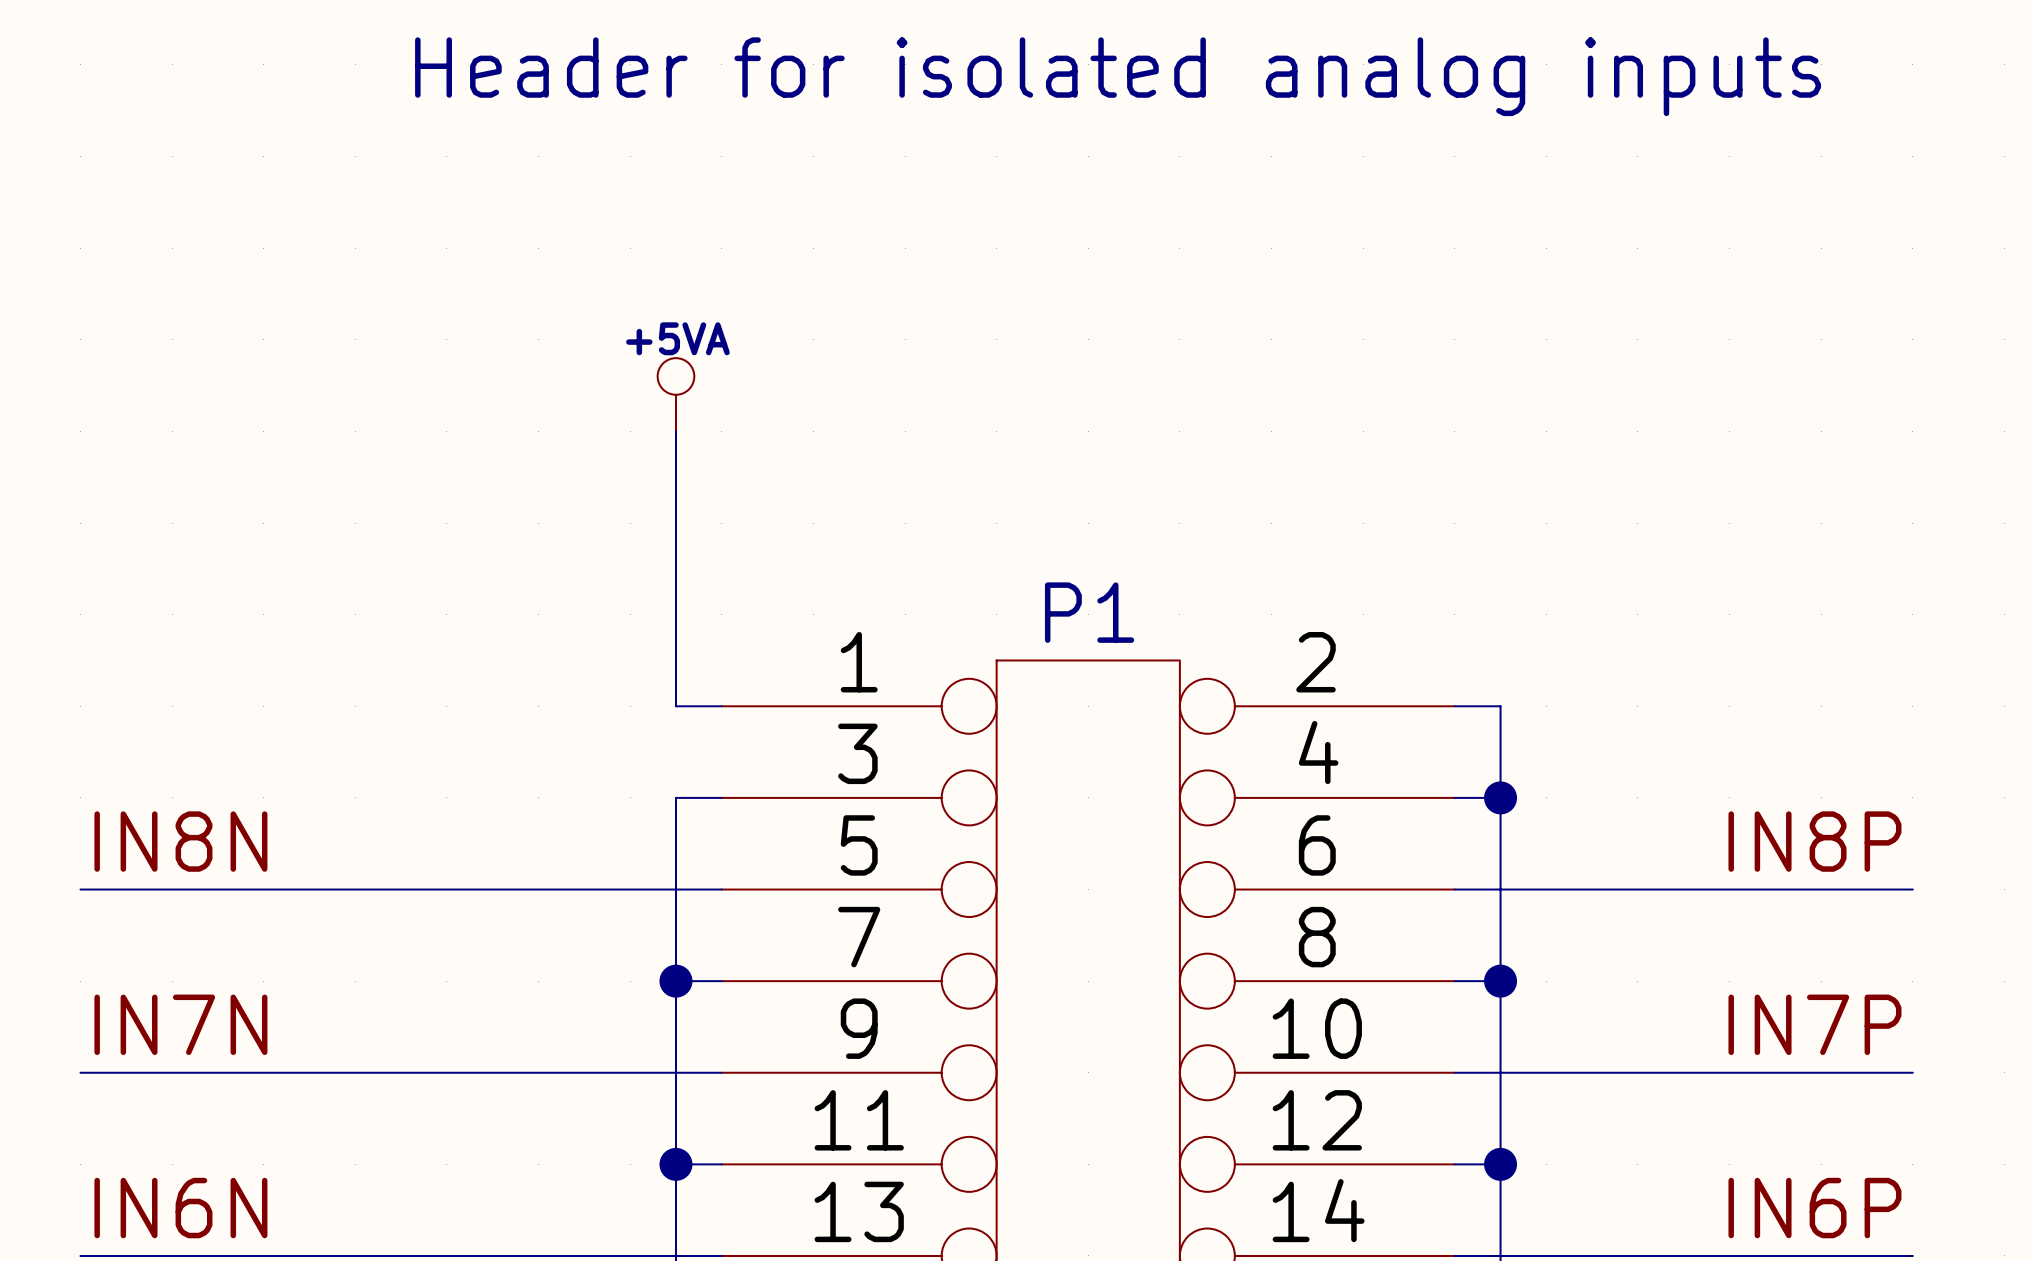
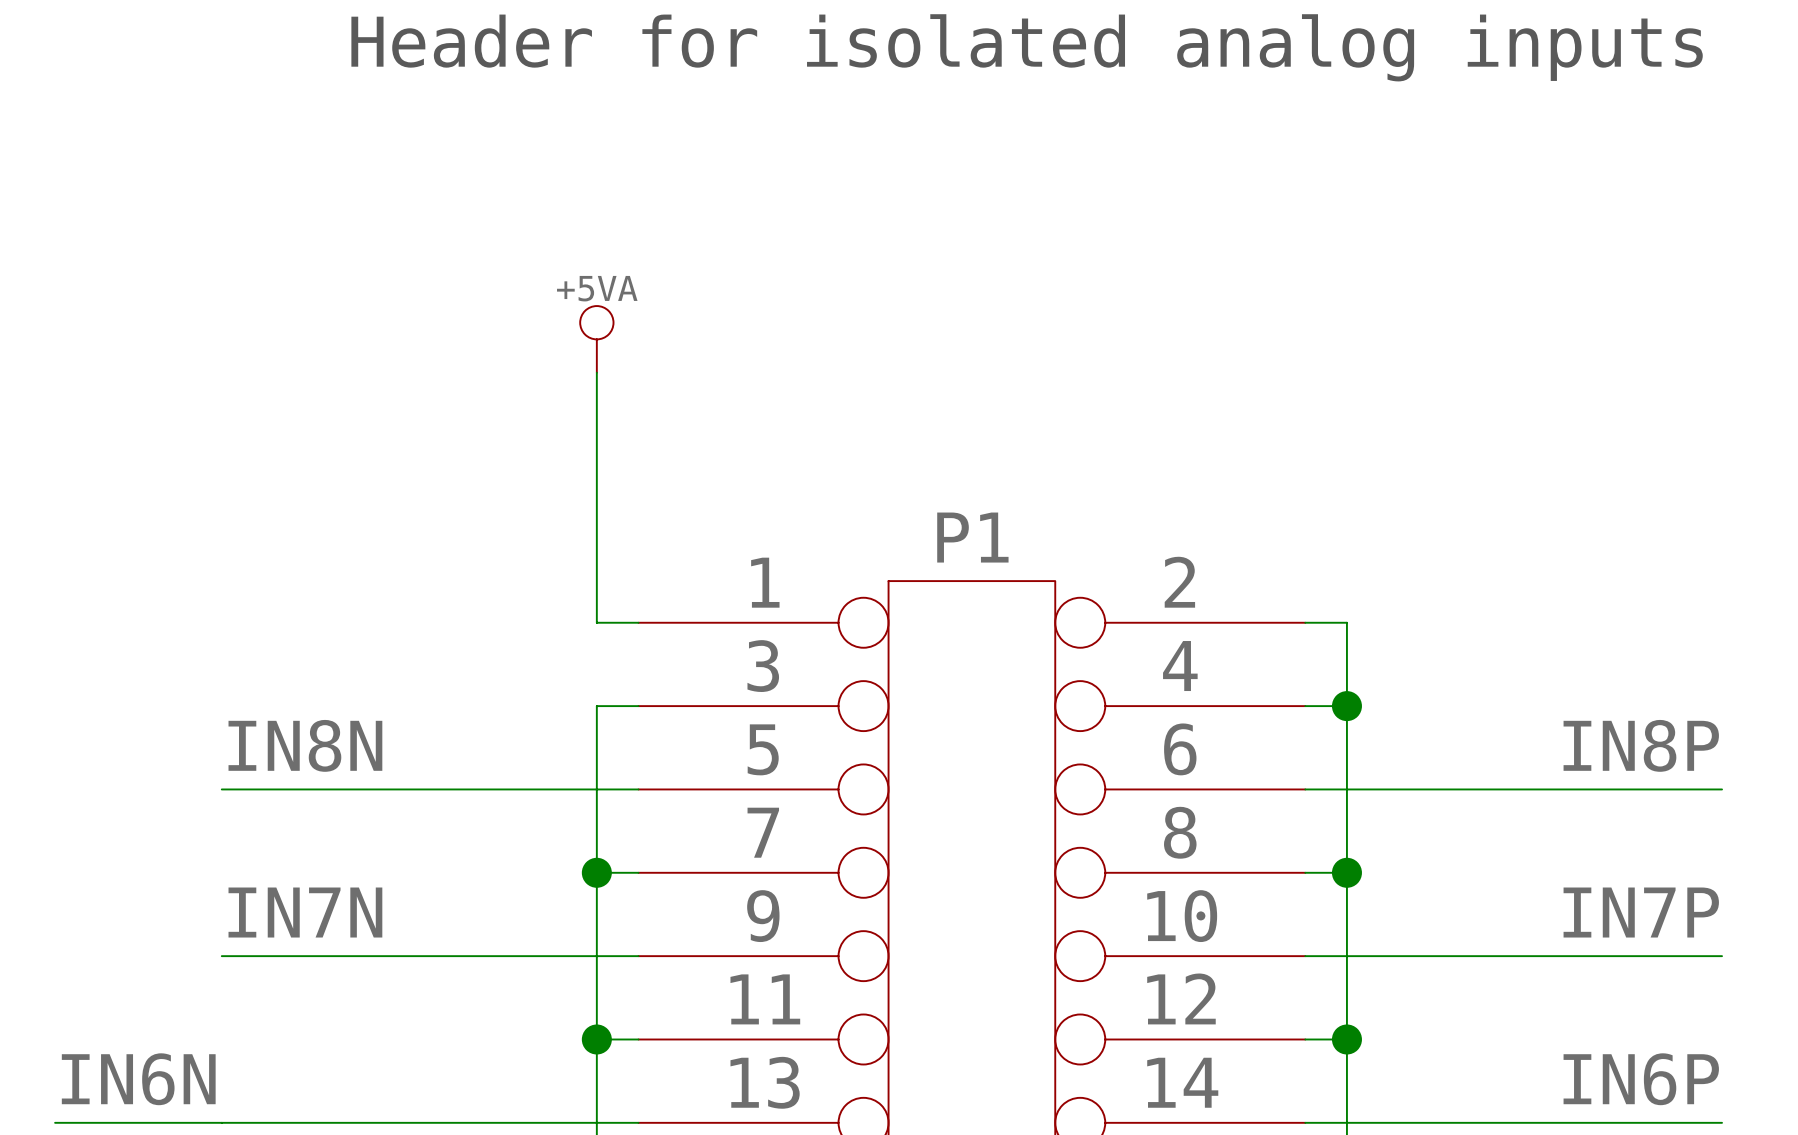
label position: IN8N (180, 841) -> IN8N (305, 745)
wire: (80, 889) (263, 889) -> none
label position: IN7N (180, 1024) -> IN7N (305, 912)
wire: (80, 1072) (263, 1072) -> none

